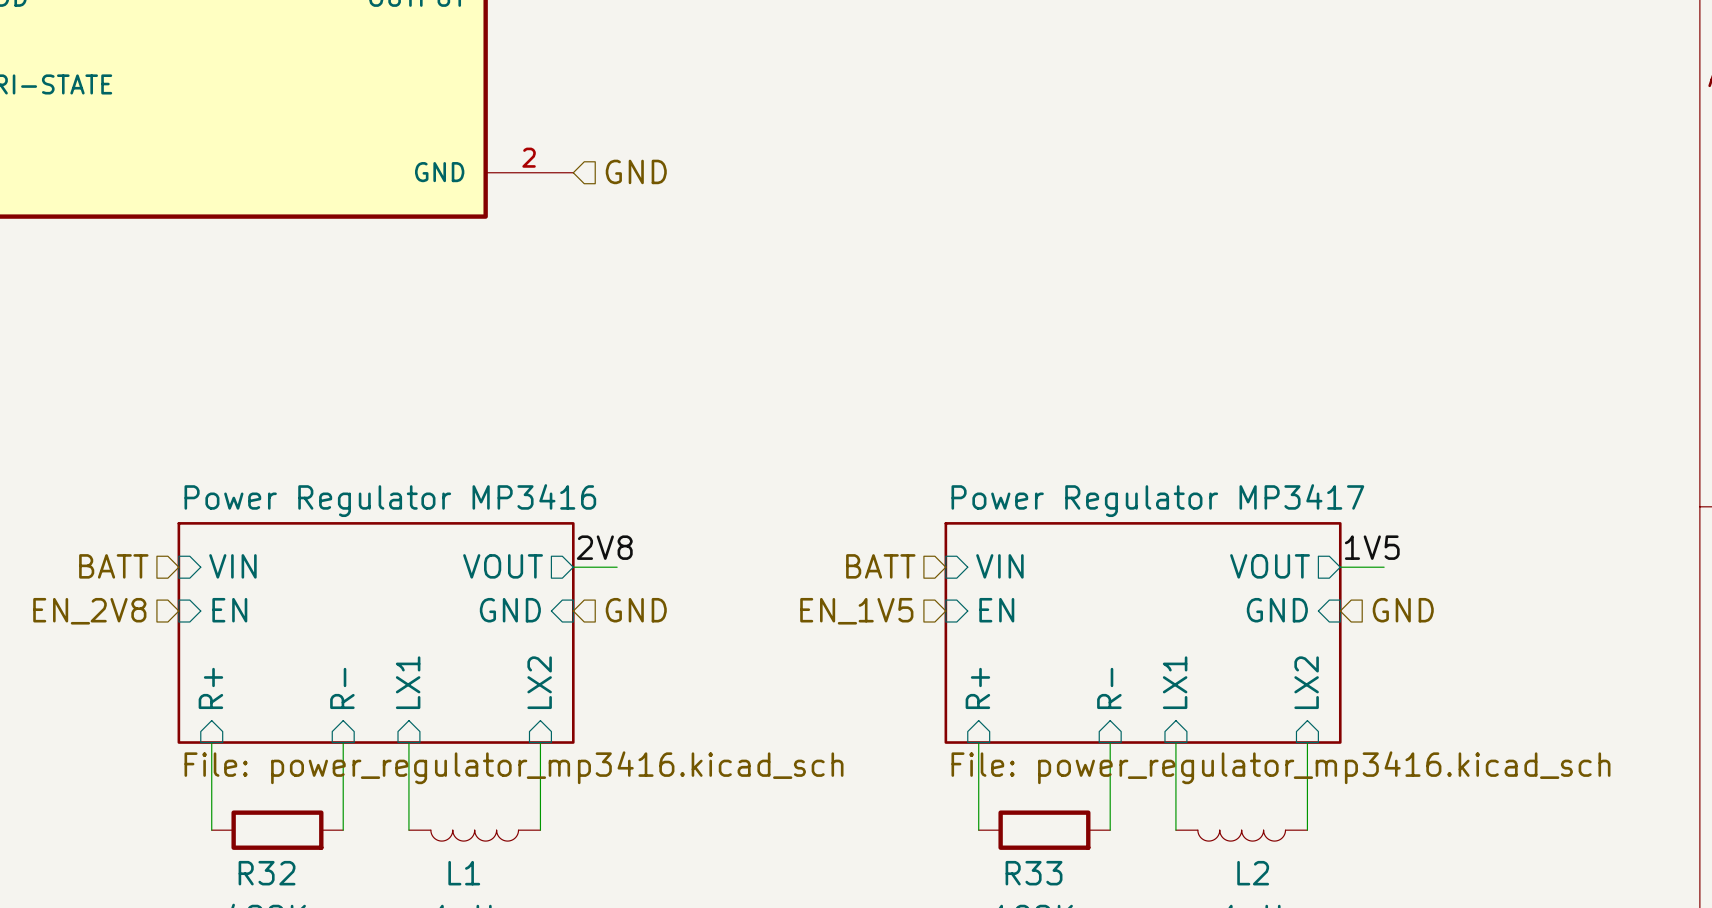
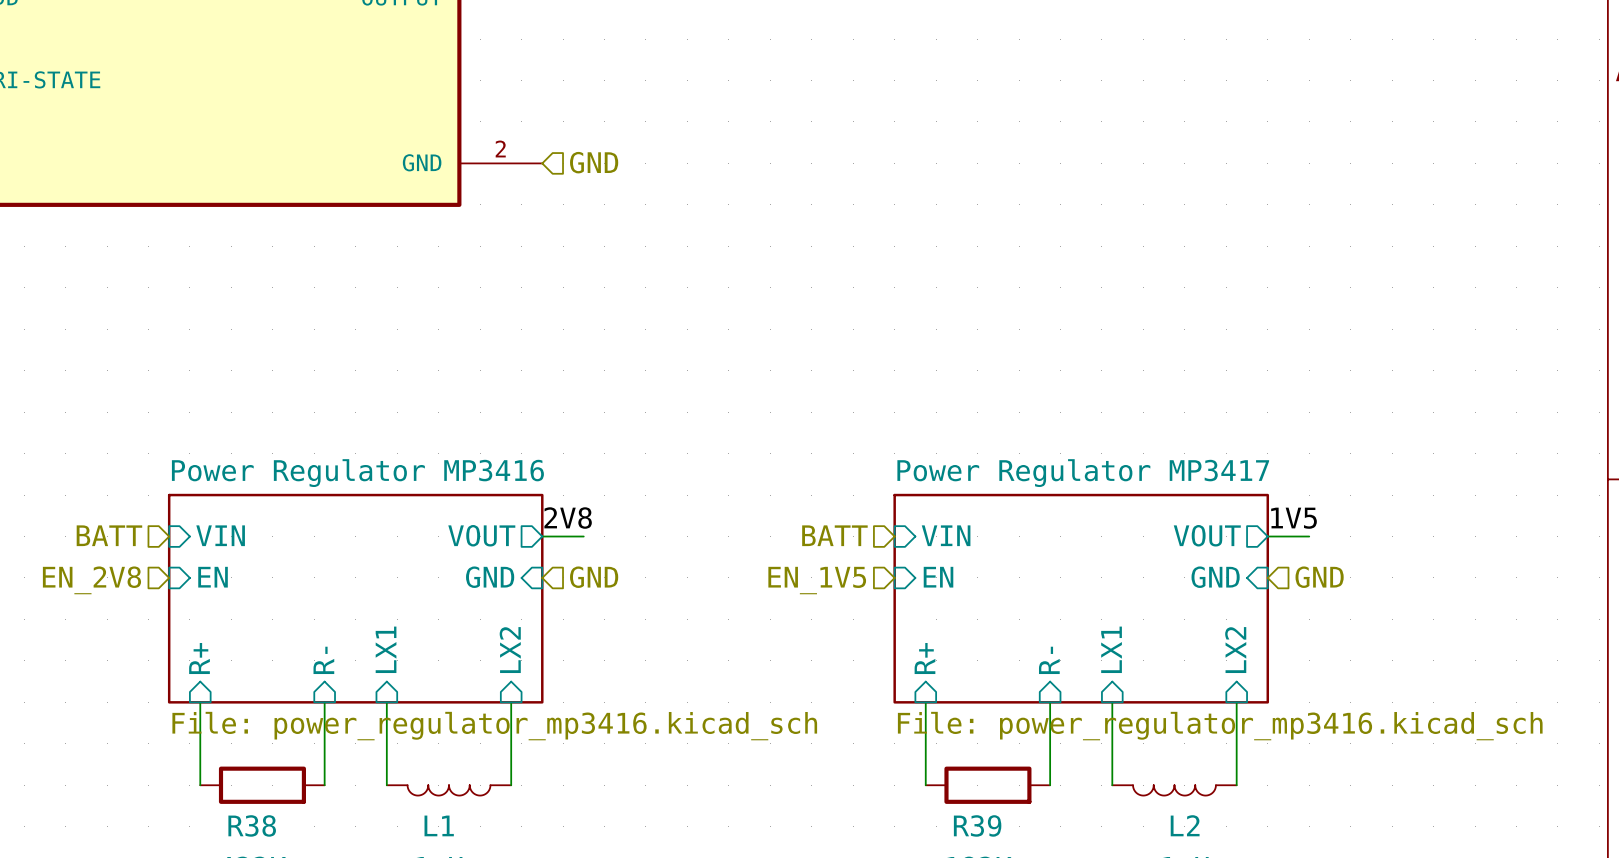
R32 name: R32 (267, 873) -> R38 (252, 825)
R33 name: R33 (1034, 873) -> R39 (977, 825)

